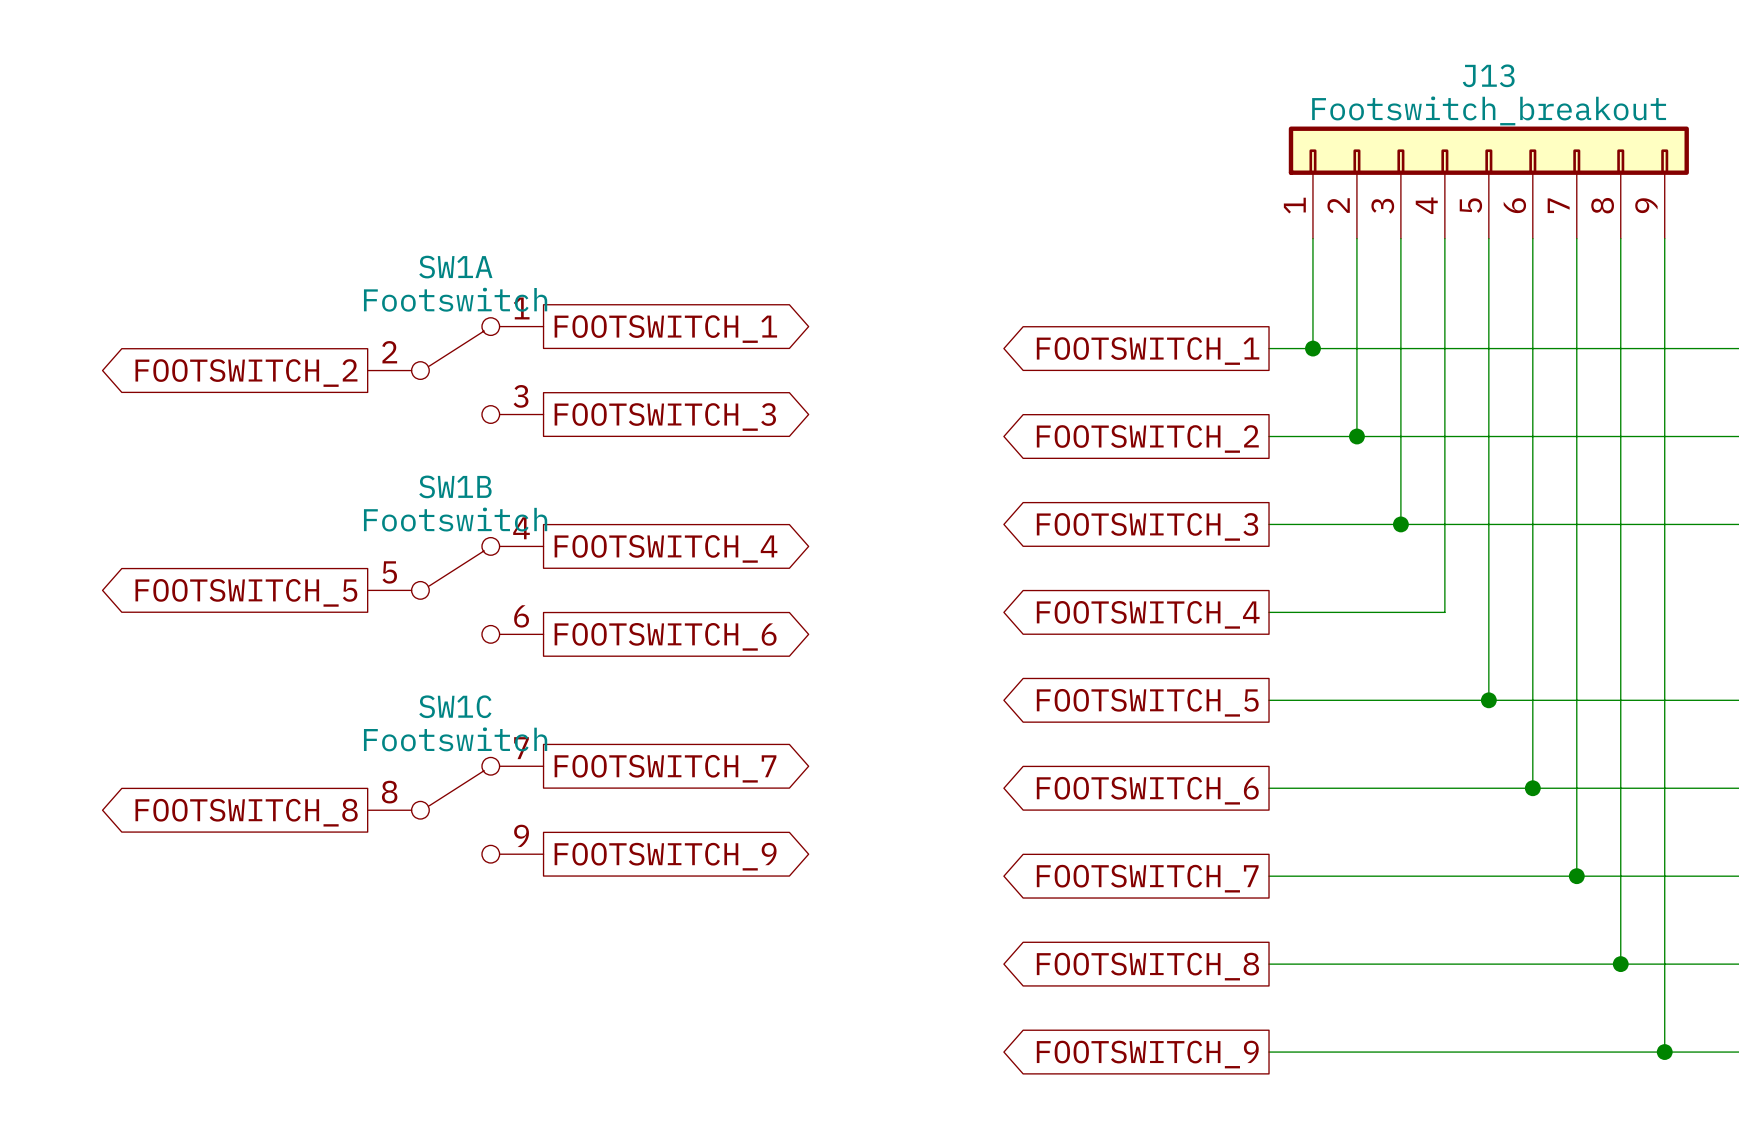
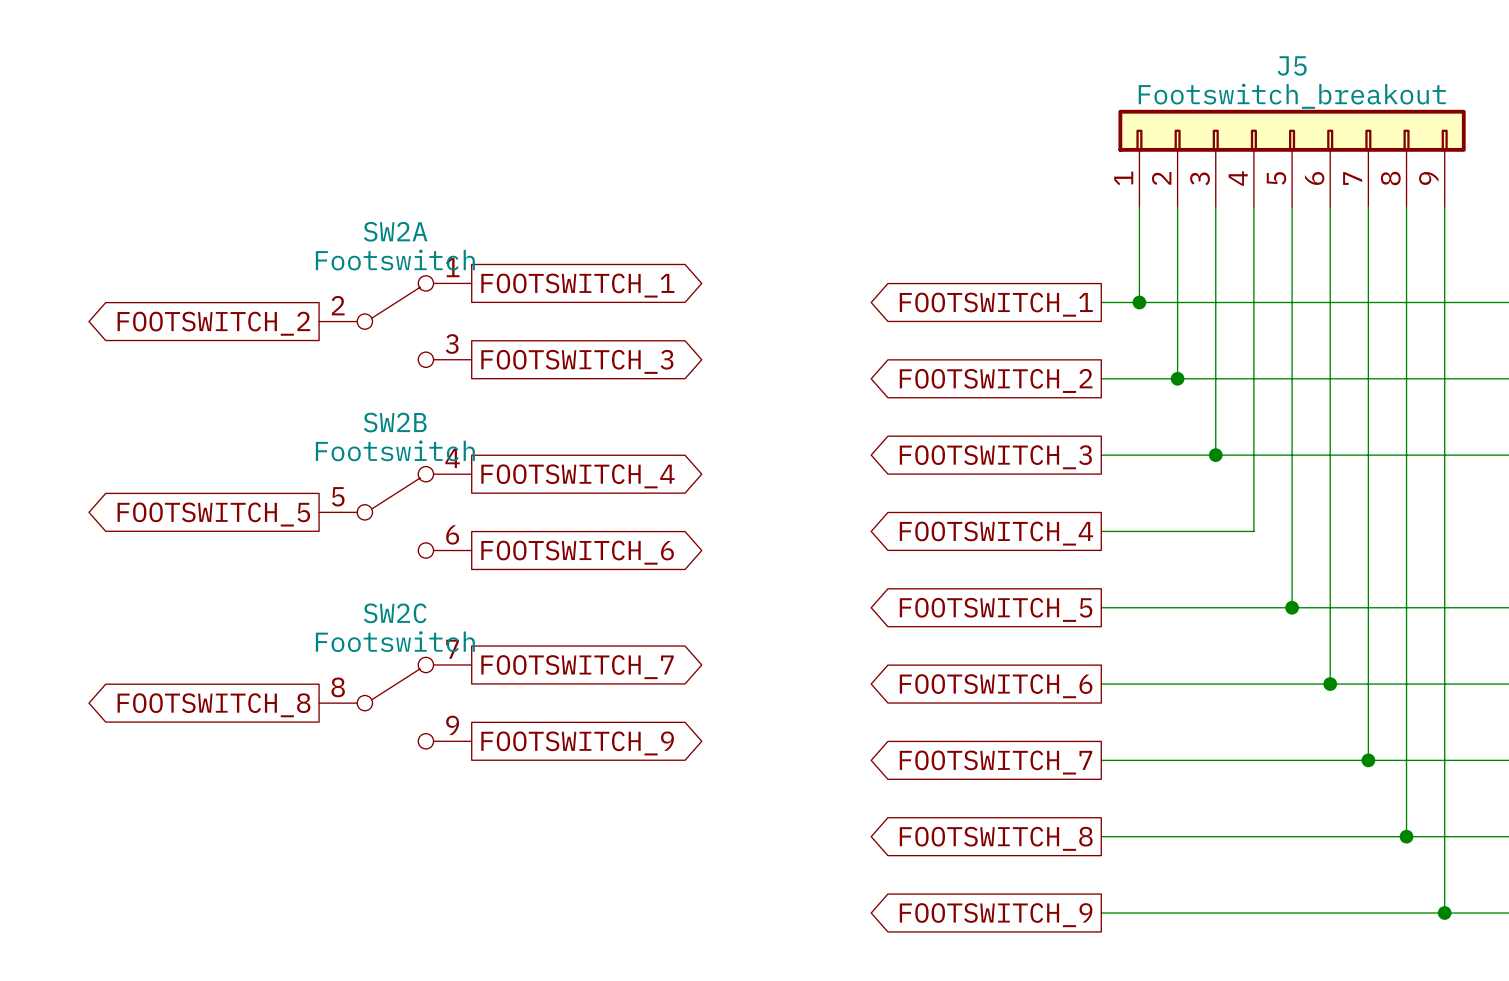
J13 name: J13 (1488, 75) -> J5 (1292, 65)
SW1A name: SW1A (455, 267) -> SW2A (395, 231)
SW1B name: SW1B (455, 486) -> SW2B (395, 422)
SW1C name: SW1C (455, 706) -> SW2C (395, 613)

